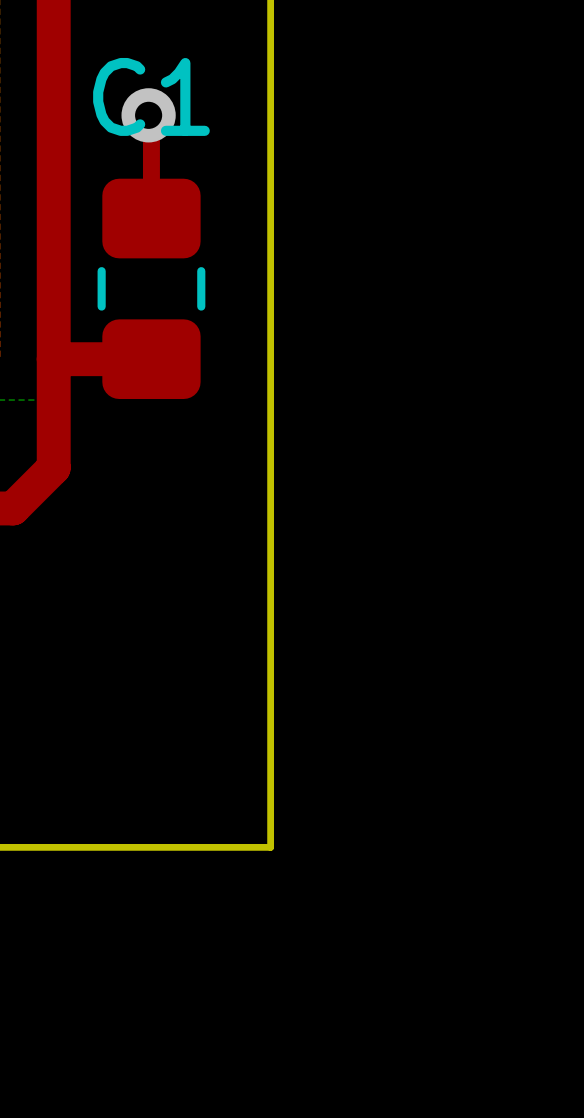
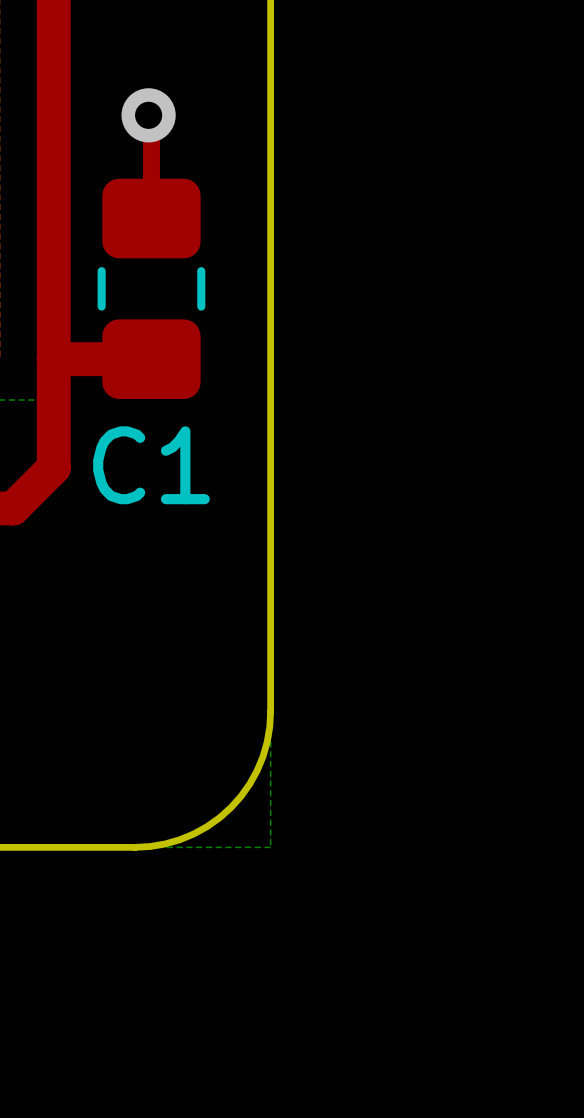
C1 name position: C1 (151, 96) -> C1 (151, 465)
board edge: (270, 711) (270, 847) (135, 847) -> (270, 711) (269, 726) (263, 756) (249, 783) (230, 807) (207, 826) (179, 839) (150, 846) (135, 847)

